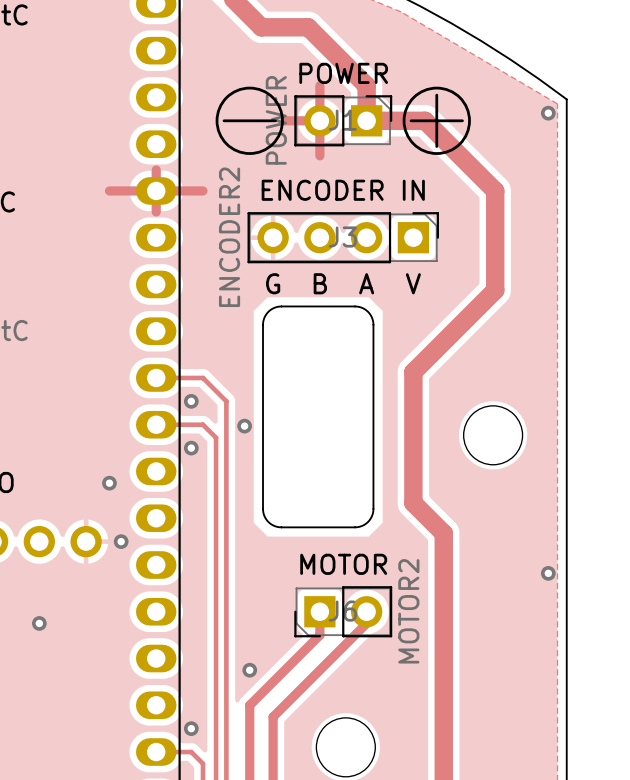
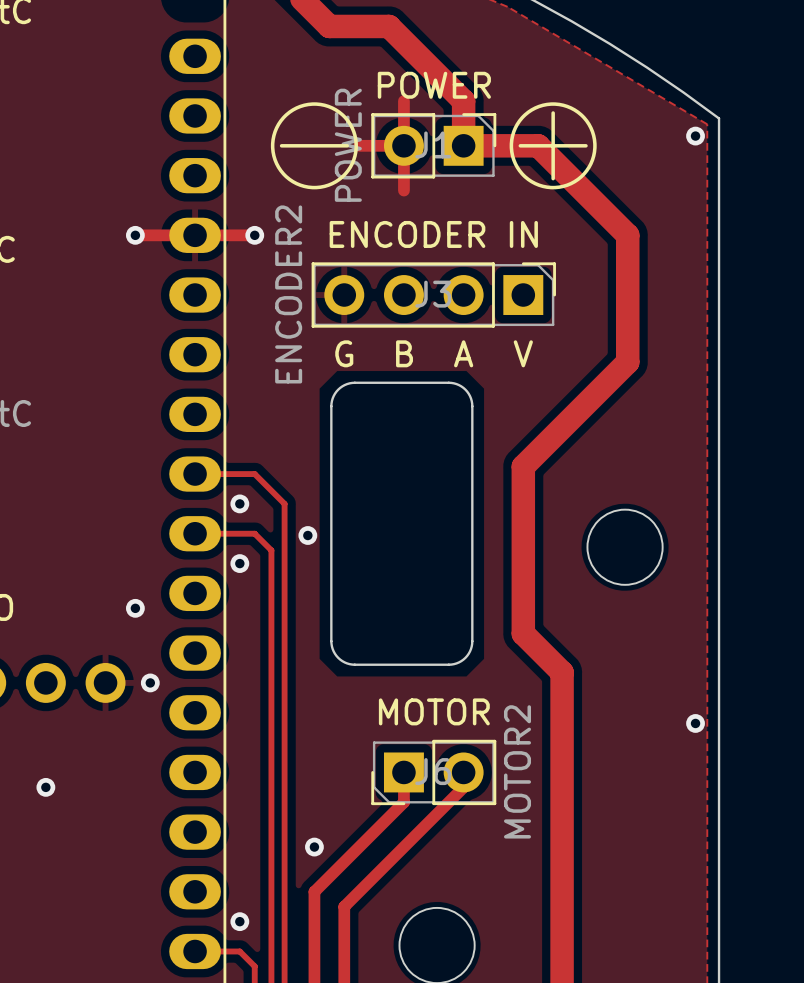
track: (156, 169) (156, 211) -> none
via: none -> (135, 235)
via: none -> (254, 235)

